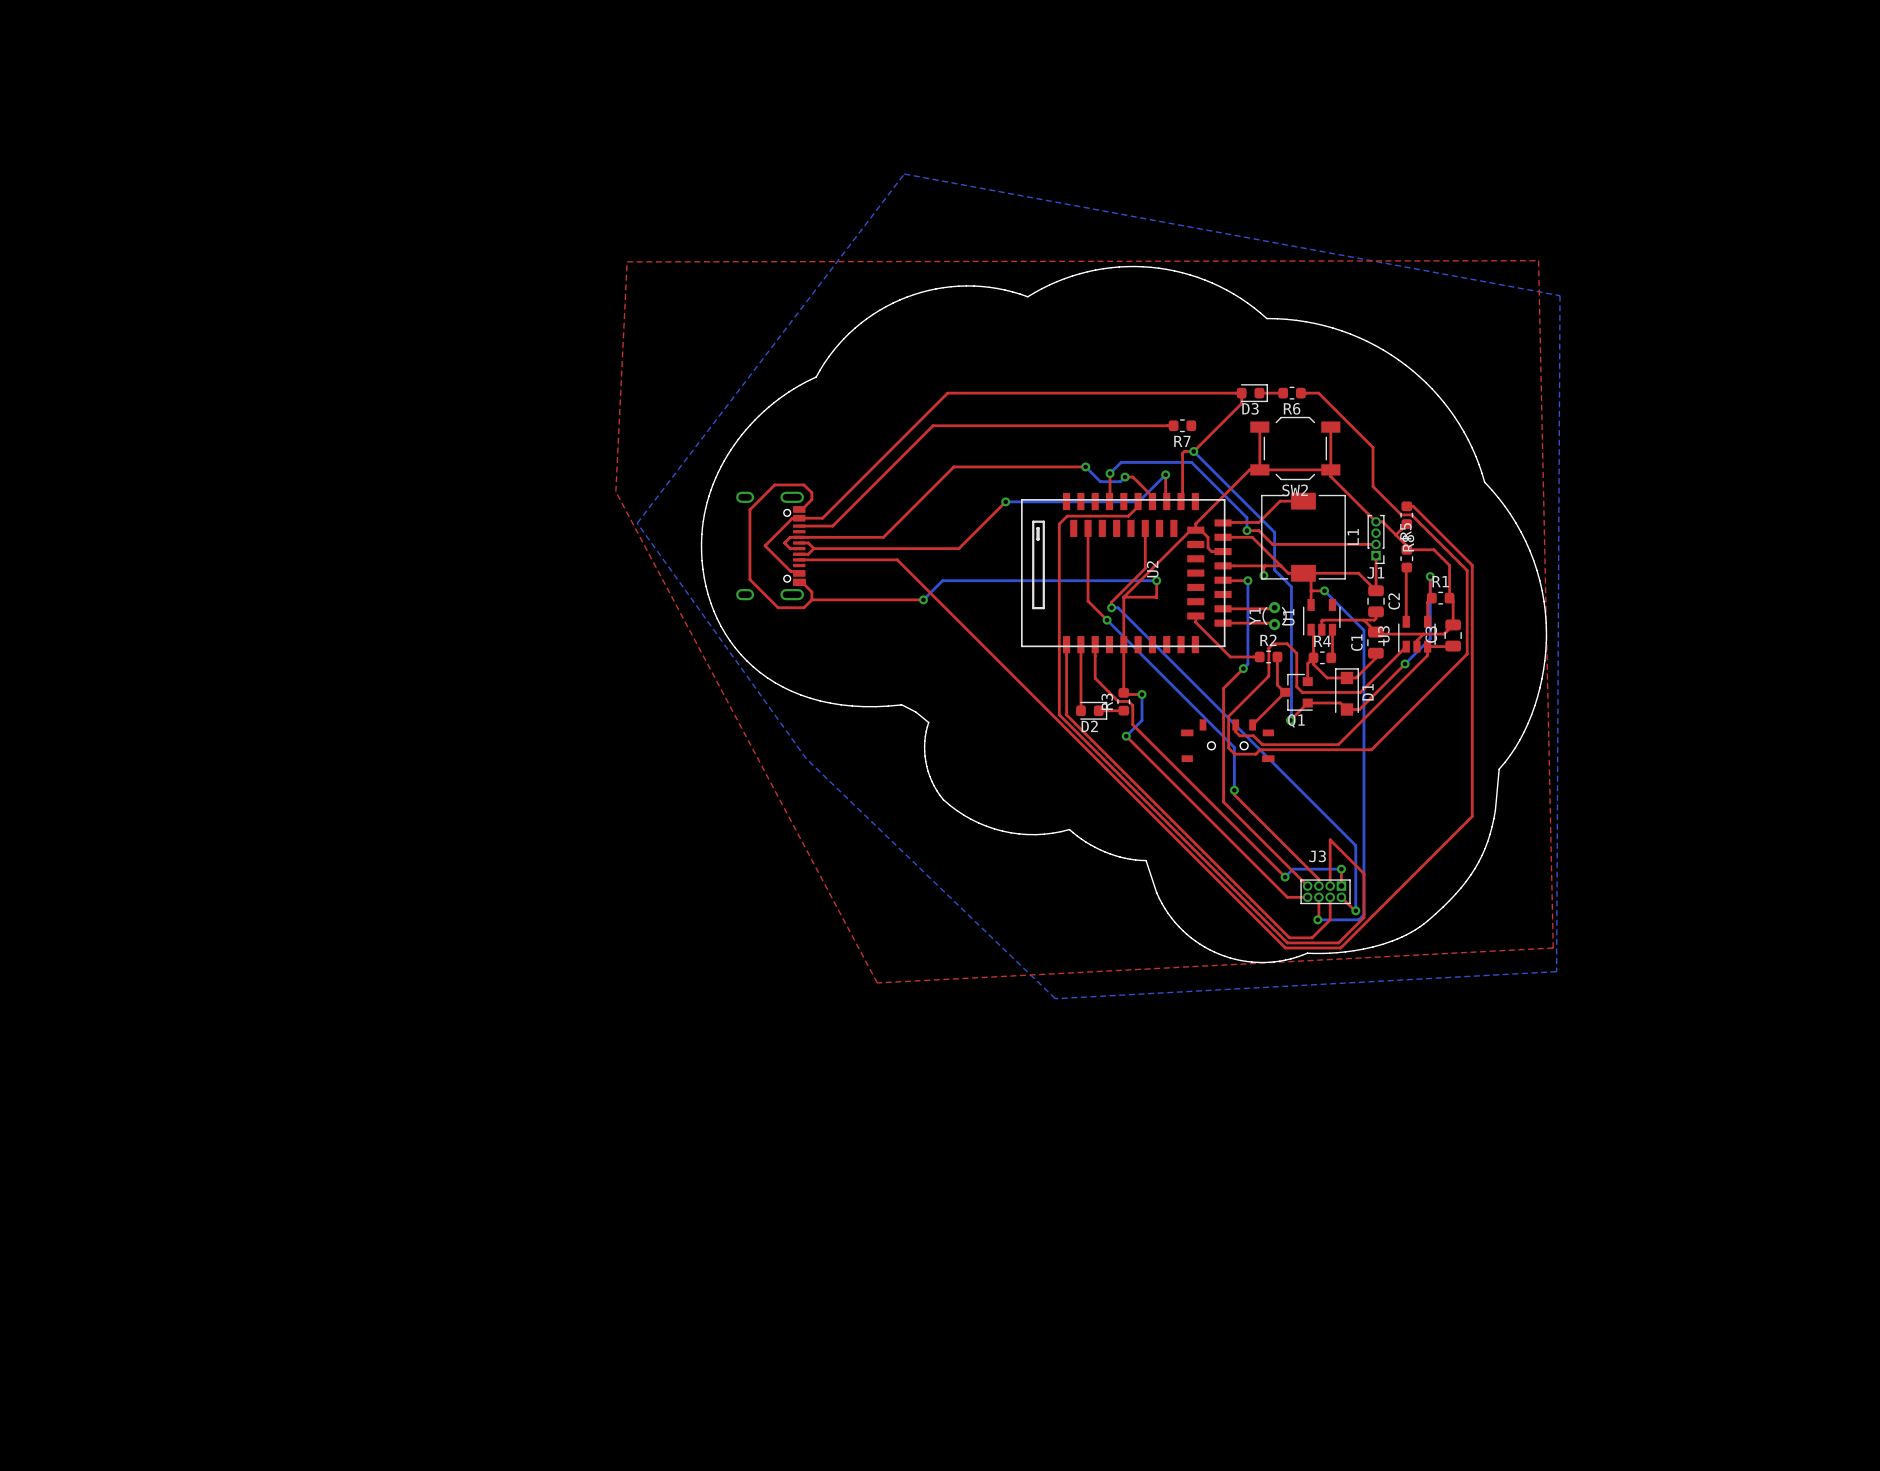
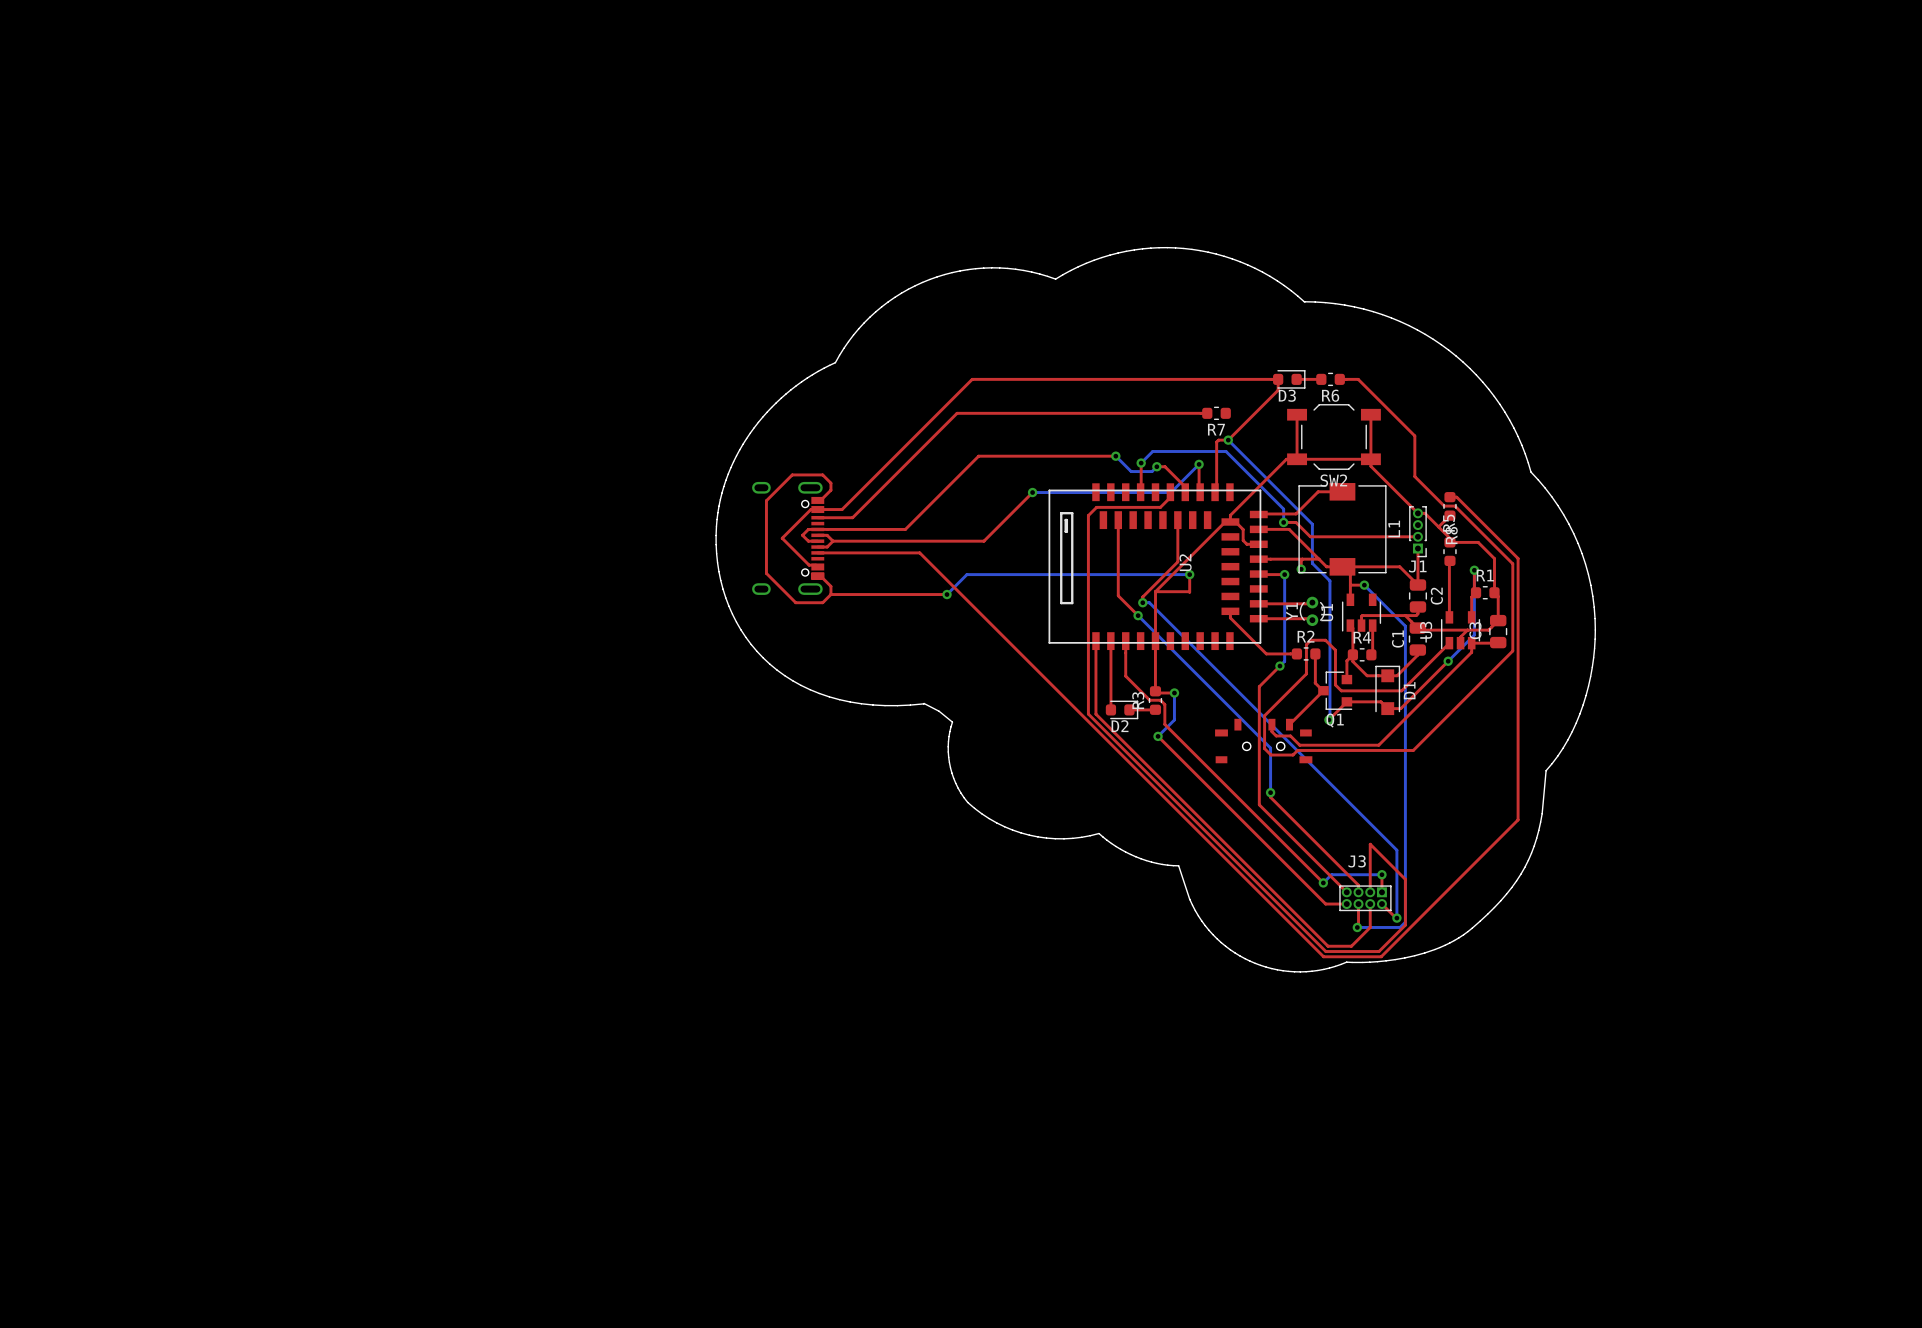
bottom zone outline: (904, 174) (637, 523) (806, 758) (1055, 998) (1556, 971) (1560, 295) (904, 174) -> none
top zone outline: (1538, 260) (627, 261) (615, 491) (877, 982) (1553, 948) (1538, 260) -> none

